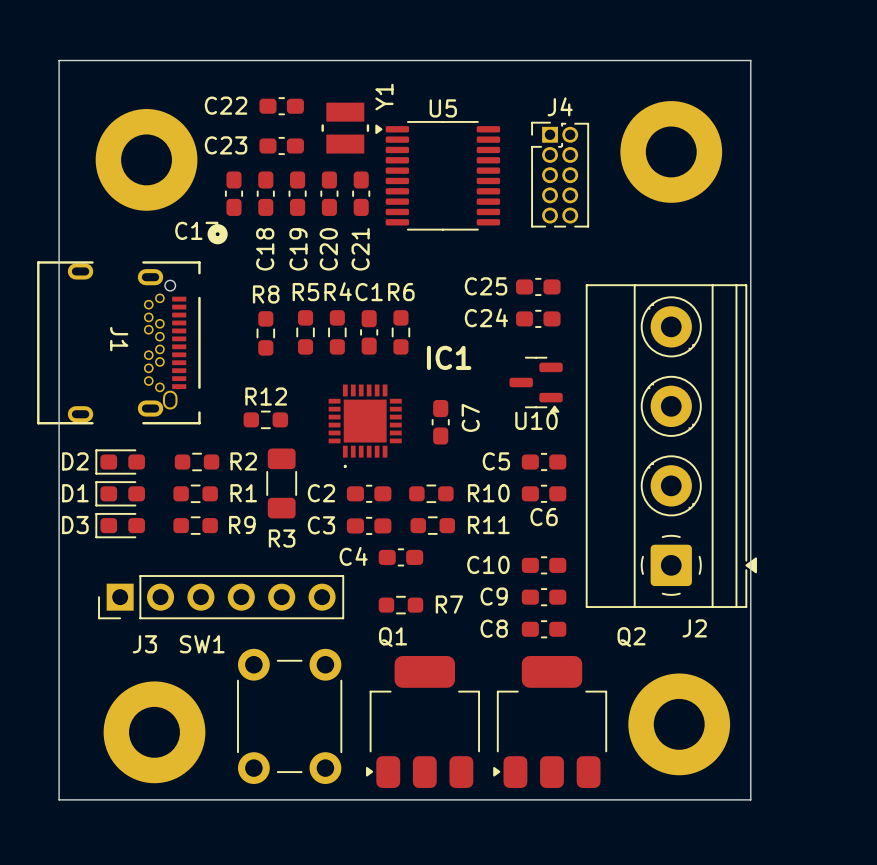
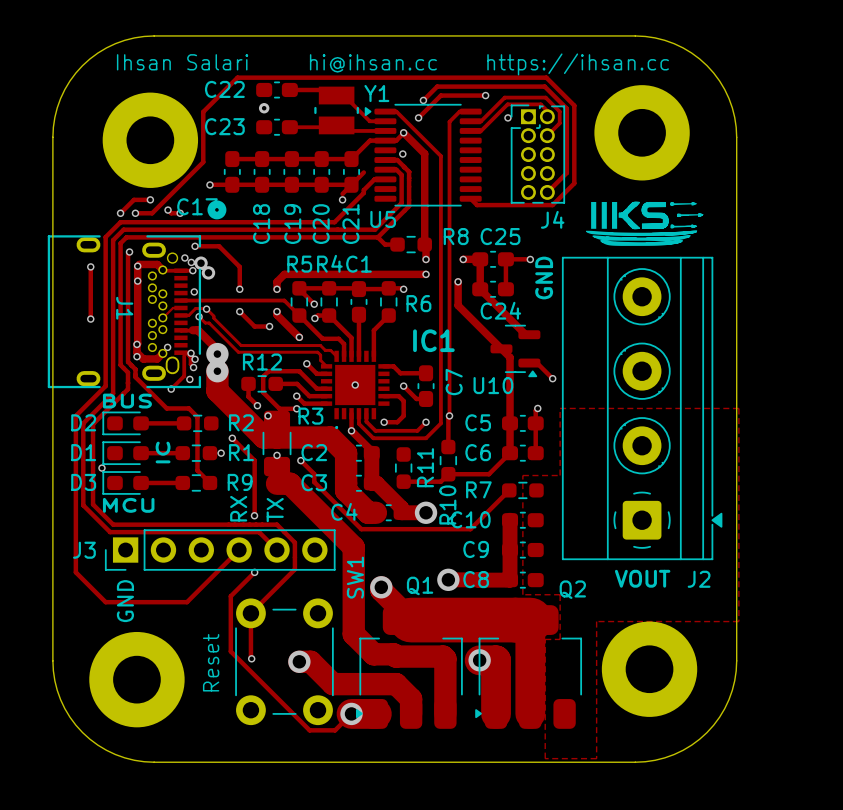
board edge: (59, 60) (750, 60) (750, 799) (59, 799) (59, 60) -> (154, 762) (635, 762) (645, 761) (664, 757) (683, 750) (699, 739) (713, 725) (724, 708) (732, 690) (736, 660) (736, 137) (734, 117) (728, 98) (713, 73) (699, 58) (683, 47) (664, 40) (635, 35) (154, 35) (134, 37) (115, 43) (97, 53) (75, 73) (64, 89) (57, 107) (52, 137) (53, 670) (60, 699) (69, 717) (82, 732) (97, 745) (115, 754) (134, 760) (144, 761) (154, 762)
text: none -> Ihsan Salari hi@ihsan.cc https://ihsan.cc (392, 64)
Y1 name rotation: 0° (384, 97) -> 90° clockwise (376, 93)
track: none -> (289, 89) (331, 89) (336, 95) (344, 95) (369, 121) (385, 121)
J4 name position: J4 (560, 106) -> J4 (552, 219)
U5 name position: U5 (443, 108) -> U5 (383, 219)
track: none -> (485, 95) (440, 95) (418, 117)
via: none -> (485, 95)
track: none -> (423, 100) (437, 86) (544, 86) (566, 108) (566, 172) (547, 192)
via: none -> (423, 100)
via: none -> (264, 108)
track: none -> (385, 111) (396, 111) (440, 156) (440, 423) (426, 438) (373, 438) (358, 423) (358, 413)
track: none -> (470, 111) (459, 111) (449, 121) (448, 447)
track: none -> (547, 116) (547, 110) (540, 104) (507, 104) (481, 130) (470, 130)
via: none -> (418, 117)
via: none -> (507, 117)
track: none -> (470, 121) (481, 121) (504, 97) (545, 97) (559, 111) (559, 123) (547, 135)
track: none -> (289, 127) (336, 125) (342, 130) (385, 130)
via: none -> (403, 132)
track: none -> (403, 133) (396, 140) (369, 140) (351, 159) (232, 159)
track: none -> (403, 133) (424, 153) (426, 259)
via: none -> (402, 154)
track: none -> (385, 160) (397, 160) (409, 171) (409, 206) (377, 237)
track: none -> (385, 169) (396, 169) (401, 174) (401, 203) (375, 229) (123, 229) (113, 240) (113, 393) (83, 423) (83, 505) (110, 532) (259, 532) (277, 550)
track: none -> (363, 172) (342, 193)
track: none -> (385, 179) (374, 179) (334, 222) (120, 222) (105, 237) (105, 386) (75, 415) (75, 572) (105, 602) (187, 602) (239, 550)
track: none -> (210, 184) (351, 184)
via: none -> (209, 184)
track: none -> (470, 198) (477, 205) (552, 205) (574, 183) (574, 105) (546, 77) (237, 77) (203, 111) (203, 162) (152, 213) (135, 213)
track: none -> (150, 199) (133, 199) (120, 213)
via: none -> (150, 199)
via: none -> (342, 199)
drawing: none -> [585, 201, 704, 246]
track: none -> (168, 210) (171, 213) (180, 213)
via: none -> (168, 210)
via: none -> (120, 213)
via: none -> (135, 213)
via: none -> (180, 213)
track: none -> (377, 237) (126, 237) (120, 243) (120, 365) (128, 372) (128, 389) (93, 424) (93, 504) (113, 524) (276, 524) (294, 542) (294, 569) (250, 613) (251, 658)
track: none -> (377, 237) (385, 244) (397, 244)
track: none -> (195, 246) (219, 246) (239, 266) (239, 289)
via: none -> (195, 246)
track: none -> (129, 252) (128, 361) (135, 369) (135, 377) (166, 408) (188, 408) (197, 417) (197, 470) (209, 482)
via: none -> (129, 252)
via: none -> (184, 257)
track: none -> (463, 259) (480, 259) (480, 289) (525, 334) (529, 334)
C25 name position: C25 (486, 286) -> C25 (500, 236)
C25 position: (538, 286) -> (493, 259)
track: none -> (530, 259) (505, 259) (505, 289)
via: none -> (426, 259)
via: none -> (463, 259)
via: none -> (530, 259)
via: none -> (191, 262)
via: none -> (201, 263)
R6 name position: R6 (401, 292) -> R6 (418, 303)
via: none -> (137, 266)
track: none -> (90, 266) (90, 319)
via: none -> (90, 266)
track: none -> (192, 270) (163, 270) (157, 264) (139, 264) (137, 266) (136, 352) (143, 359)
via: none -> (192, 270)
via: none -> (208, 272)
track: none -> (426, 274) (284, 274) (277, 281) (277, 289)
via: none -> (426, 274)
text: none -> GND (544, 278)
via: none -> (137, 281)
track: none -> (458, 281) (458, 305) (510, 357) (510, 453) (488, 474) (448, 474) (440, 481) (403, 481)
via: none -> (458, 281)
C24 name position: C24 (486, 317) -> C24 (500, 310)
via: none -> (239, 289)
via: none -> (277, 289)
track: none -> (403, 289) (299, 288) (314, 304)
via: none -> (403, 289)
C24 position: (538, 318) -> (493, 289)
via: none -> (194, 291)
track: none -> (180, 300) (284, 300) (322, 338) (338, 338) (344, 344) (344, 356)
R8 rotation: 0° (265, 333) -> 90° clockwise (411, 244)
R8 position: (265, 333) -> (411, 244)
via: none -> (314, 304)
track: none -> (180, 307) (173, 307) (162, 317)
track: none -> (206, 309) (195, 308) (188, 315) (180, 315)
track: none -> (206, 309) (241, 345) (320, 345) (325, 350) (330, 350) (336, 356)
via: none -> (206, 309)
track: none -> (239, 311) (254, 326) (269, 326)
via: none -> (239, 311)
track: none -> (277, 311) (277, 315) (299, 337)
via: none -> (277, 311)
track: none -> (358, 314) (358, 356)
track: none -> (388, 315) (373, 330) (373, 356)
track: none -> (199, 316) (205, 323) (209, 323) (238, 352) (317, 352) (320, 355) (320, 360) (326, 366)
via: none -> (199, 316)
via: none -> (90, 319)
track: none -> (314, 318) (317, 315) (329, 315) (351, 337) (351, 356)
via: none -> (314, 318)
IC1 name position: IC1 (449, 357) -> IC1 (433, 340)
via: none -> (269, 326)
track: none -> (180, 330) (197, 330) (217, 349) (217, 390) (263, 437) (330, 437) (346, 453) (346, 490) (368, 512) (375, 512)
via: none -> (299, 337)
via: none -> (136, 344)
via: none -> (167, 347)
track: none -> (186, 352) (190, 357) (190, 364) (193, 367)
track: none -> (162, 353) (157, 358) (143, 358)
via: none -> (191, 353)
via: none -> (217, 354)
via: none -> (136, 356)
track: none -> (184, 355) (184, 376) (171, 389)
via: none -> (195, 359)
track: none -> (529, 363) (537, 363) (552, 378)
track: none -> (306, 363) (316, 373) (326, 373)
via: none -> (306, 363)
track: none -> (383, 366) (393, 366) (400, 373) (426, 373)
via: none -> (193, 367)
via: none -> (217, 371)
via: none -> (552, 378)
via: none -> (189, 379)
track: none -> (248, 383) (248, 396) (257, 405)
track: none -> (275, 383) (297, 383) (309, 396) (326, 396)
U10 name position: U10 (536, 420) -> U10 (493, 385)
via: none -> (355, 385)
track: none -> (403, 386) (416, 398) (426, 398)
via: none -> (403, 386)
via: none -> (171, 389)
track: none -> (326, 388) (316, 388) (299, 371) (268, 371) (263, 376) (263, 392) (279, 408) (296, 408)
track: none -> (296, 396) (304, 403) (326, 403)
via: none -> (296, 396)
track: none -> (383, 396) (398, 396) (403, 401) (403, 415) (397, 422) (384, 422)
text: none -> BUS (127, 401)
via: none -> (257, 405)
via: none -> (296, 408)
track: none -> (537, 408) (535, 410) (535, 453)
via: none -> (537, 408)
zone outline: none -> (560, 408) (560, 475) (522, 475) (522, 594) (560, 594) (560, 639) (545, 639) (545, 758) (596, 758) (596, 621) (738, 621) (738, 408) (560, 408)
track: none -> (351, 413) (351, 430) (371, 451) (371, 483) (376, 483) (401, 507) (401, 512) (426, 512)
track: none -> (366, 413) (366, 421) (375, 430) (417, 430) (426, 422)
via: none -> (268, 415)
via: none -> (449, 415)
via: none -> (384, 422)
via: none -> (426, 422)
track: none -> (141, 423) (184, 423)
via: none -> (351, 430)
track: none -> (232, 438) (254, 460) (254, 515)
via: none -> (232, 438)
track: none -> (141, 453) (182, 453)
text: none -> IC (163, 452)
via: none -> (221, 453)
R10 rotation: 0° (431, 493) -> 90° clockwise (448, 460)
R10 position: (431, 493) -> (448, 460)
track: none -> (277, 455) (277, 483) (290, 483) (353, 547) (353, 634) (373, 654) (393, 654) (395, 656) (443, 656) (445, 658) (445, 713)
via: none -> (277, 455)
track: none -> (300, 460) (314, 474) (314, 482) (361, 529) (470, 529) (509, 490)
via: none -> (300, 460)
via: none -> (101, 468)
C6 name position: C6 (544, 517) -> C6 (478, 452)
track: none -> (141, 482) (182, 482)
R11 rotation: 0° (432, 525) -> 90° clockwise (403, 468)
R3 name position: R3 (282, 538) -> R3 (310, 416)
text: none -> MCU (128, 505)
text: none -> RX (238, 508)
text: none -> TX (275, 510)
via: none -> (426, 512)
via: none -> (254, 515)
track: none -> (510, 520) (510, 580) (448, 579)
R7 name position: R7 (449, 604) -> R7 (478, 489)
R7 position: (400, 605) -> (522, 490)
track: none -> (254, 572) (230, 596) (230, 651) (309, 730) (335, 730) (351, 713) (376, 713)
via: none -> (254, 572)
text: none -> VOUT (642, 578)
via: none -> (448, 579)
J2 name position: J2 (694, 628) -> J2 (699, 579)
track: none -> (381, 587) (381, 590) (411, 620) (530, 620)
via: none -> (381, 587)
Q1 name position: Q1 (393, 637) -> Q1 (420, 585)
Q2 name position: Q2 (631, 637) -> Q2 (572, 589)
J3 name position: J3 (144, 644) -> J3 (84, 550)
SW1 name rotation: 0° (202, 644) -> 90° counterclockwise (355, 577)
SW1 name position: SW1 (202, 644) -> SW1 (355, 577)
text: none -> GND (125, 601)
track: none -> (515, 620) (530, 634) (530, 713)
via: none -> (251, 658)
track: none -> (479, 660) (496, 660) (496, 713)
via: none -> (479, 660)
track: none -> (299, 661) (310, 661) (333, 684) (396, 684) (411, 699) (411, 713)
via: none -> (299, 661)
text: none -> Reset (211, 662)
part position: (154, 732) -> (136, 679)
via: none -> (351, 713)

